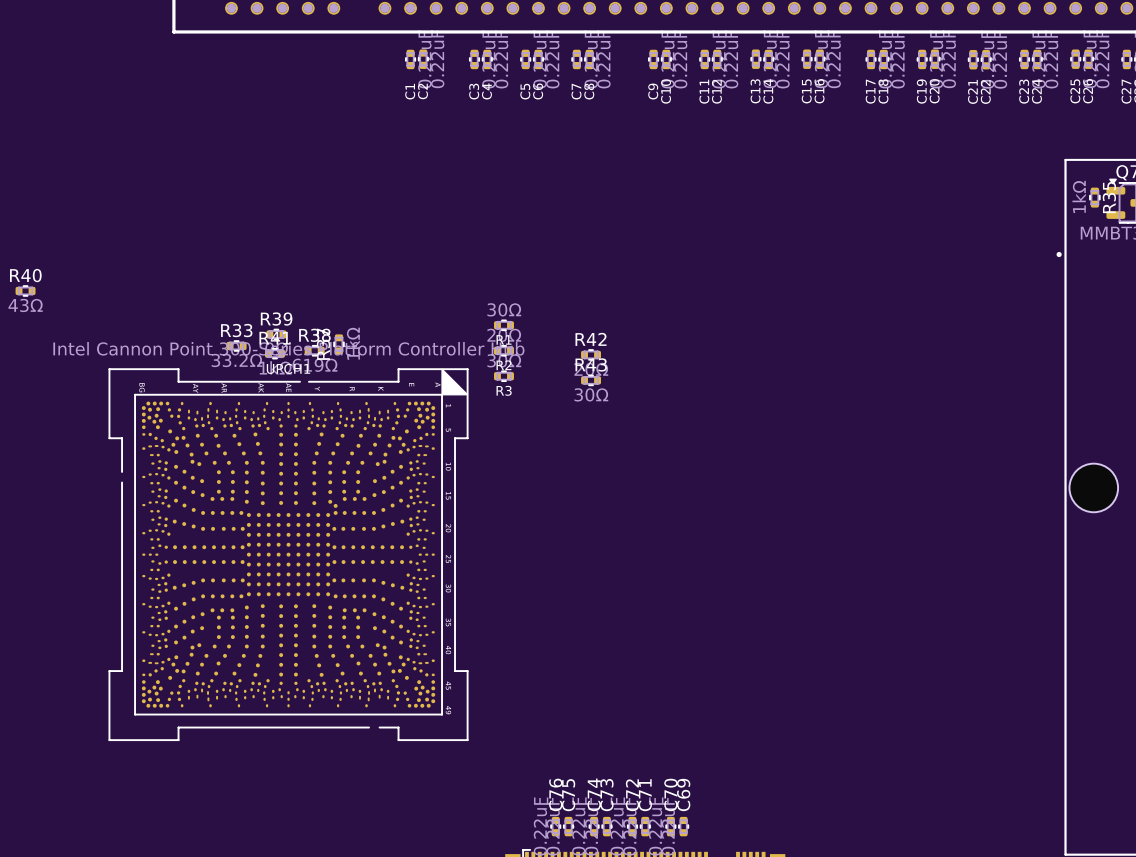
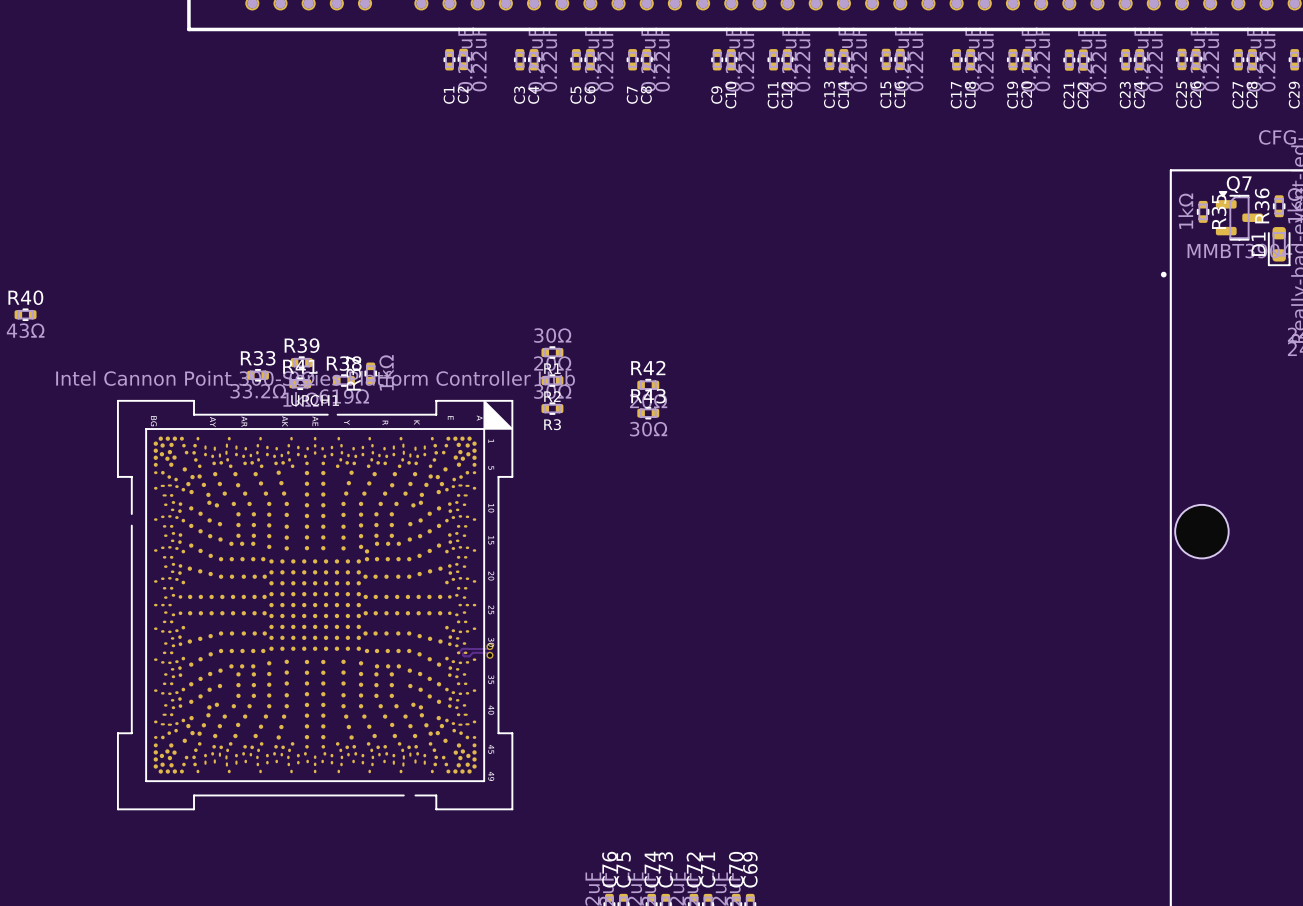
track: none -> (489, 646) (487, 649) (462, 649) (458, 652)
via: none -> (489, 646)
track: none -> (465, 652) (463, 653) (464, 656) (469, 656) (472, 652) (487, 652) (489, 655)
via: none -> (489, 655)

